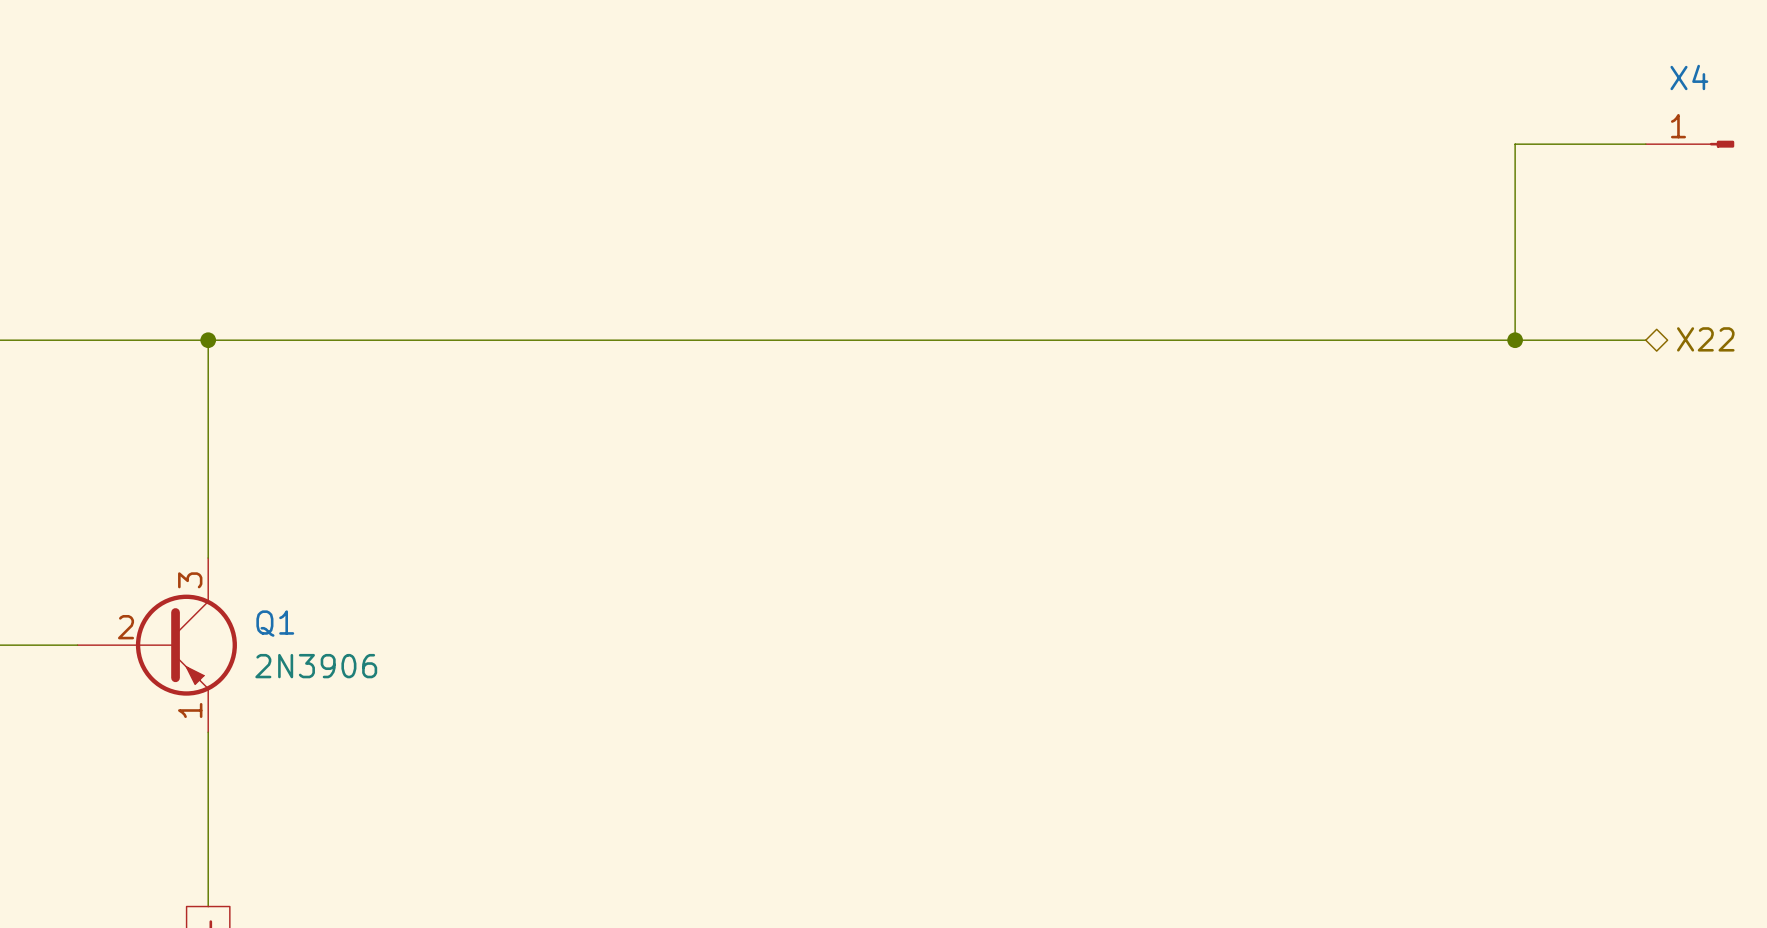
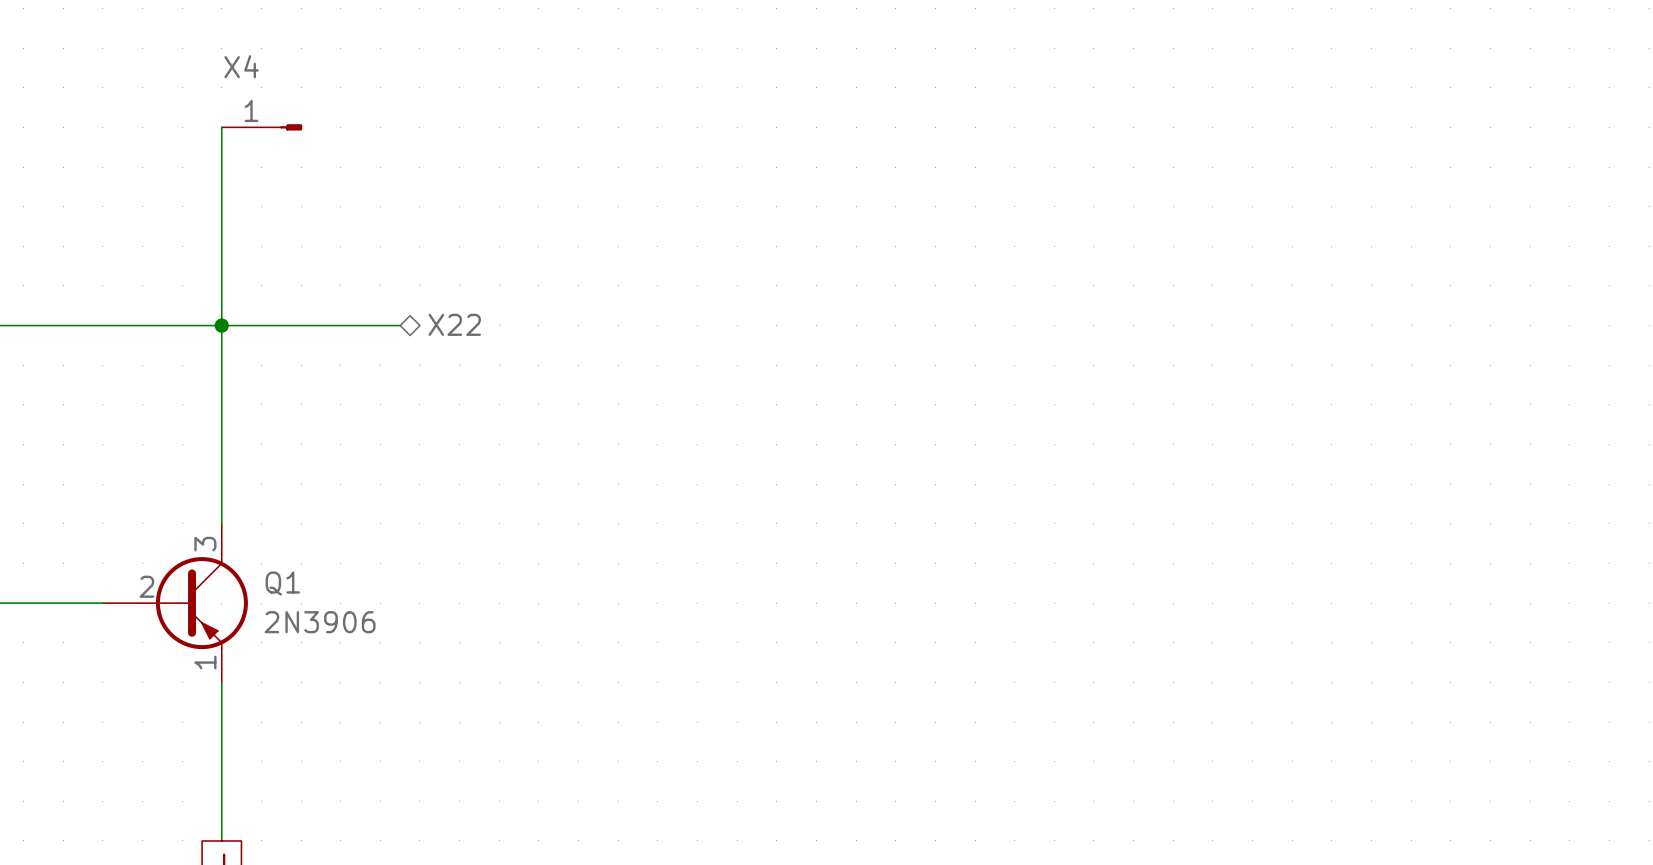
X4 name position: X4 (1689, 77) -> X4 (241, 66)
wire: none -> (221, 127) (221, 325)
wire: (1645, 144) (1515, 144) (1515, 340) -> none
X4 position: (1690, 144) -> (261, 127)
hierarchical label: none -> X22 (454, 324)
hierarchical label: X22 (1705, 339) -> none
wire: (404, 340) (1645, 340) -> none
junction: (1515, 340) -> none

